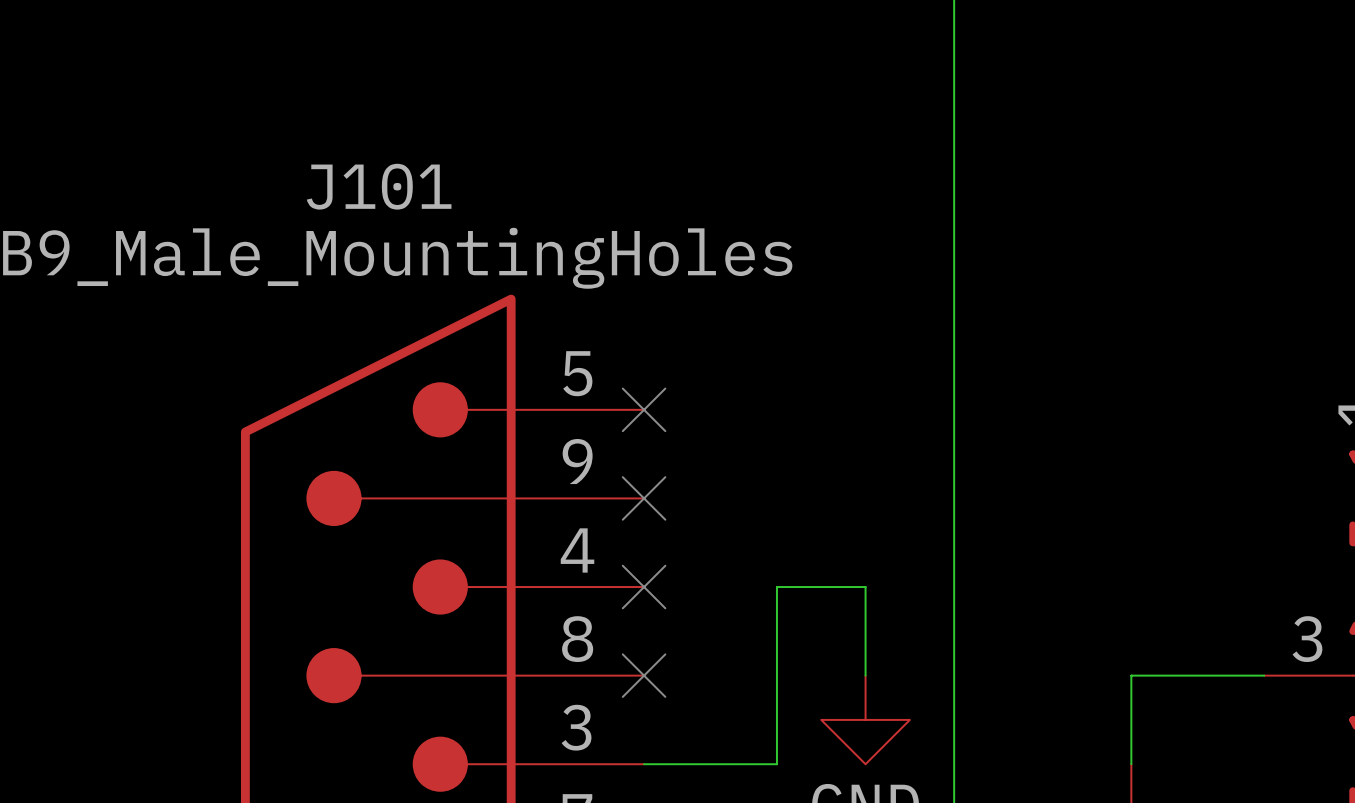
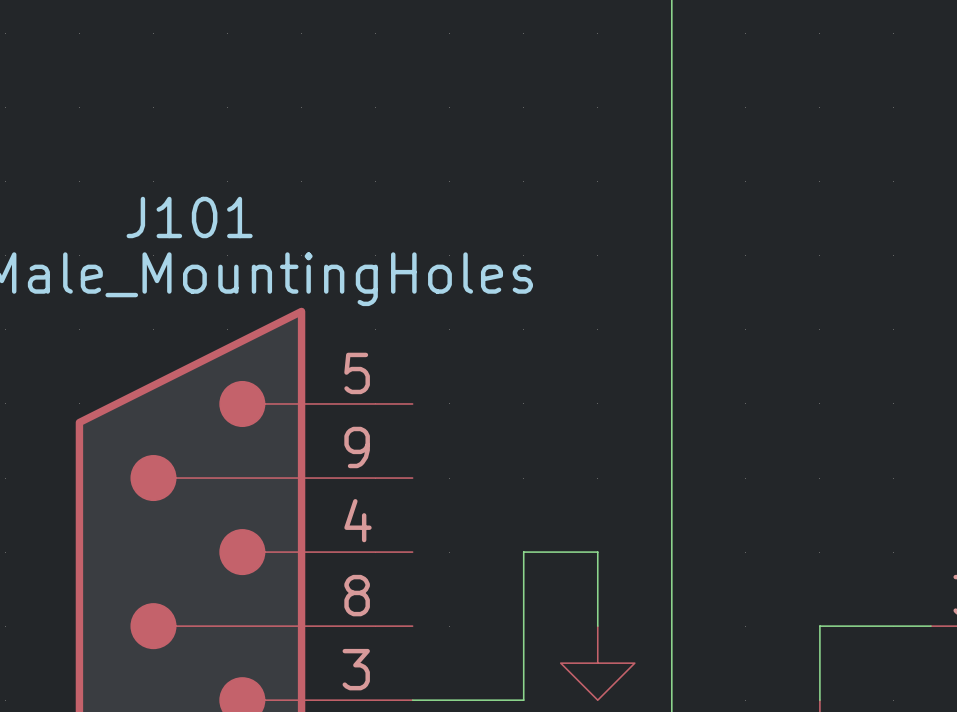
no-connect mark: (644, 409) -> none
no-connect mark: (644, 498) -> none
no-connect mark: (644, 587) -> none
no-connect mark: (644, 675) -> none

